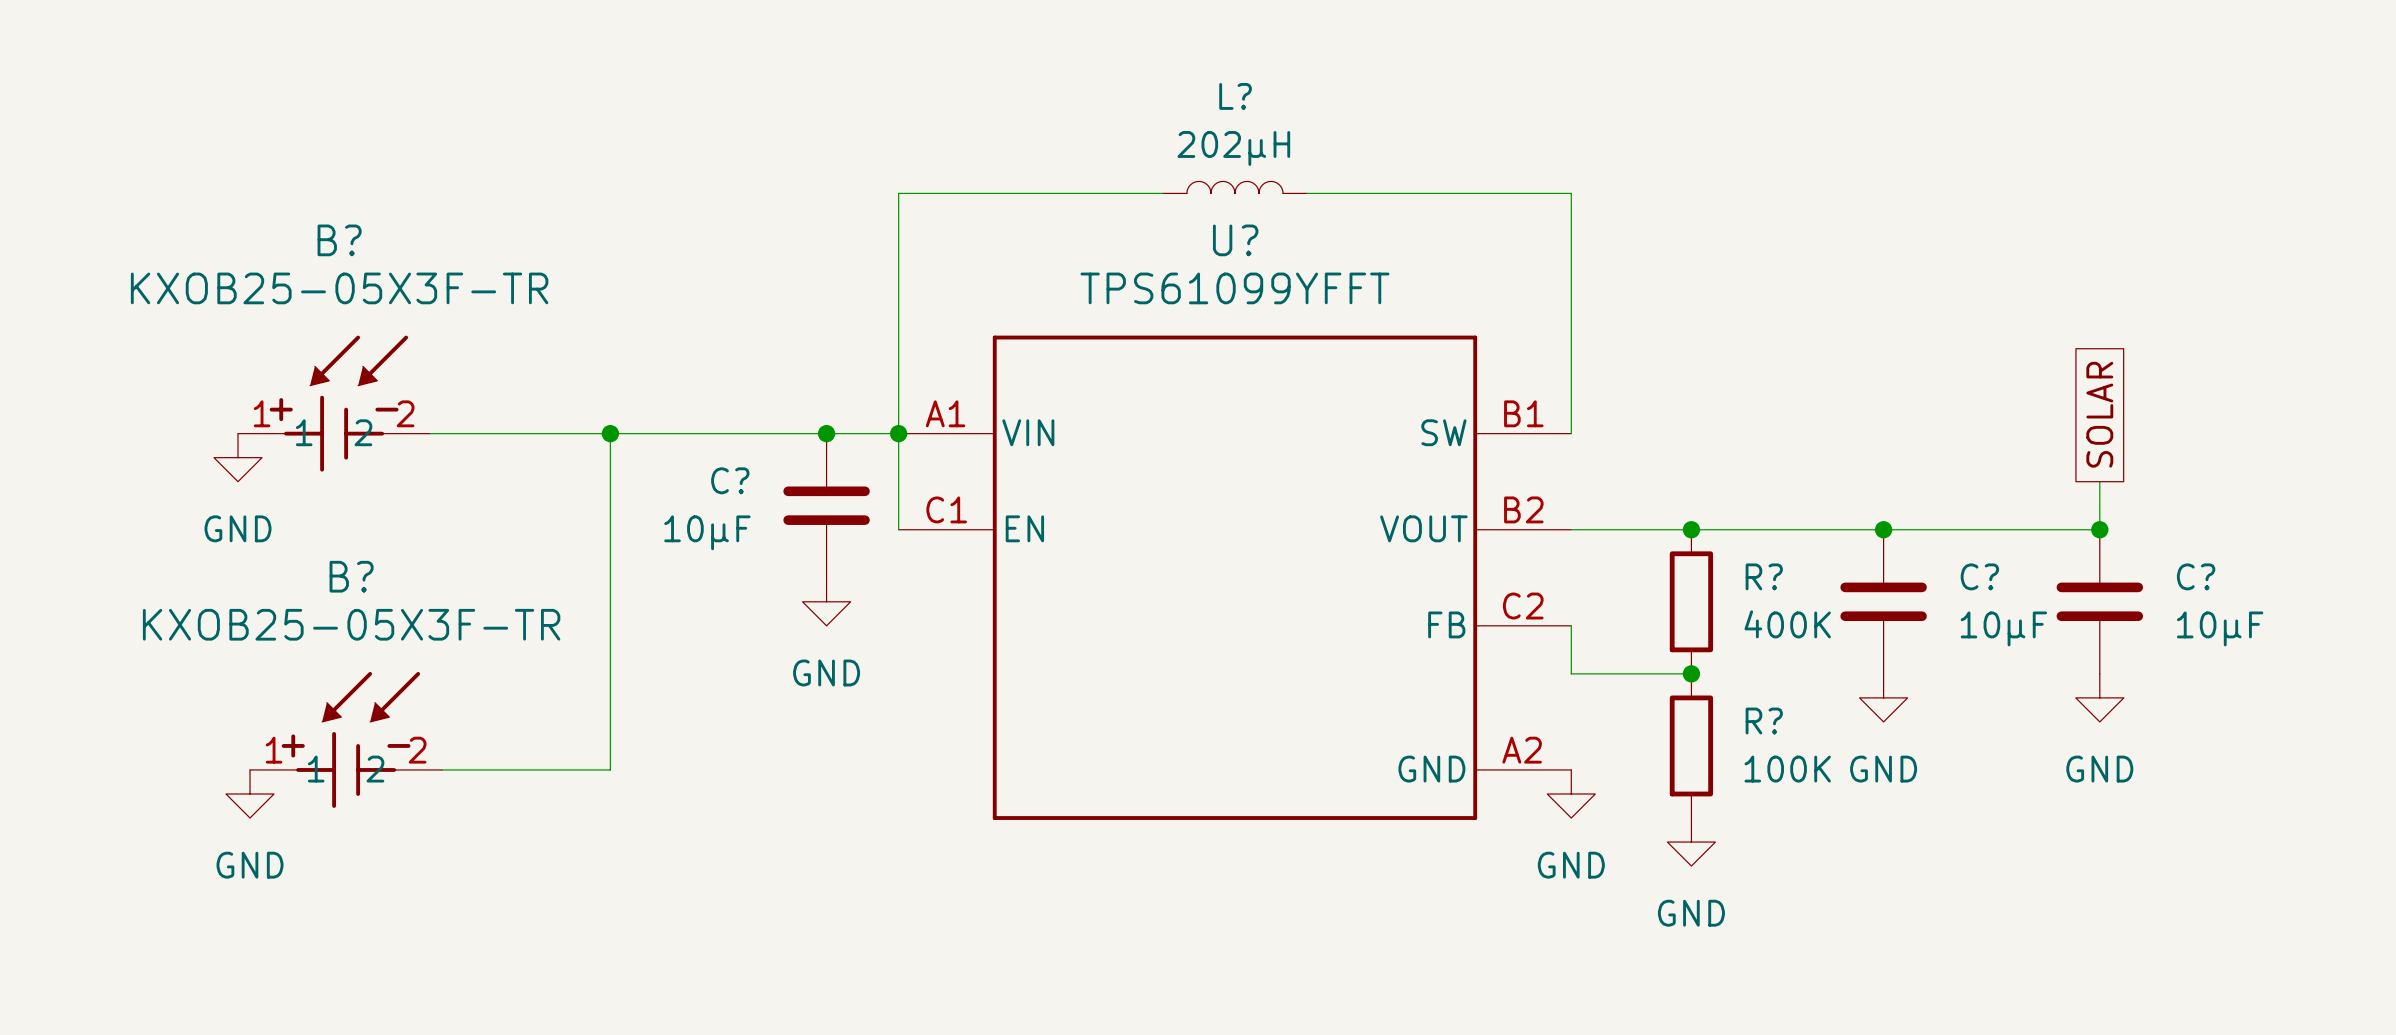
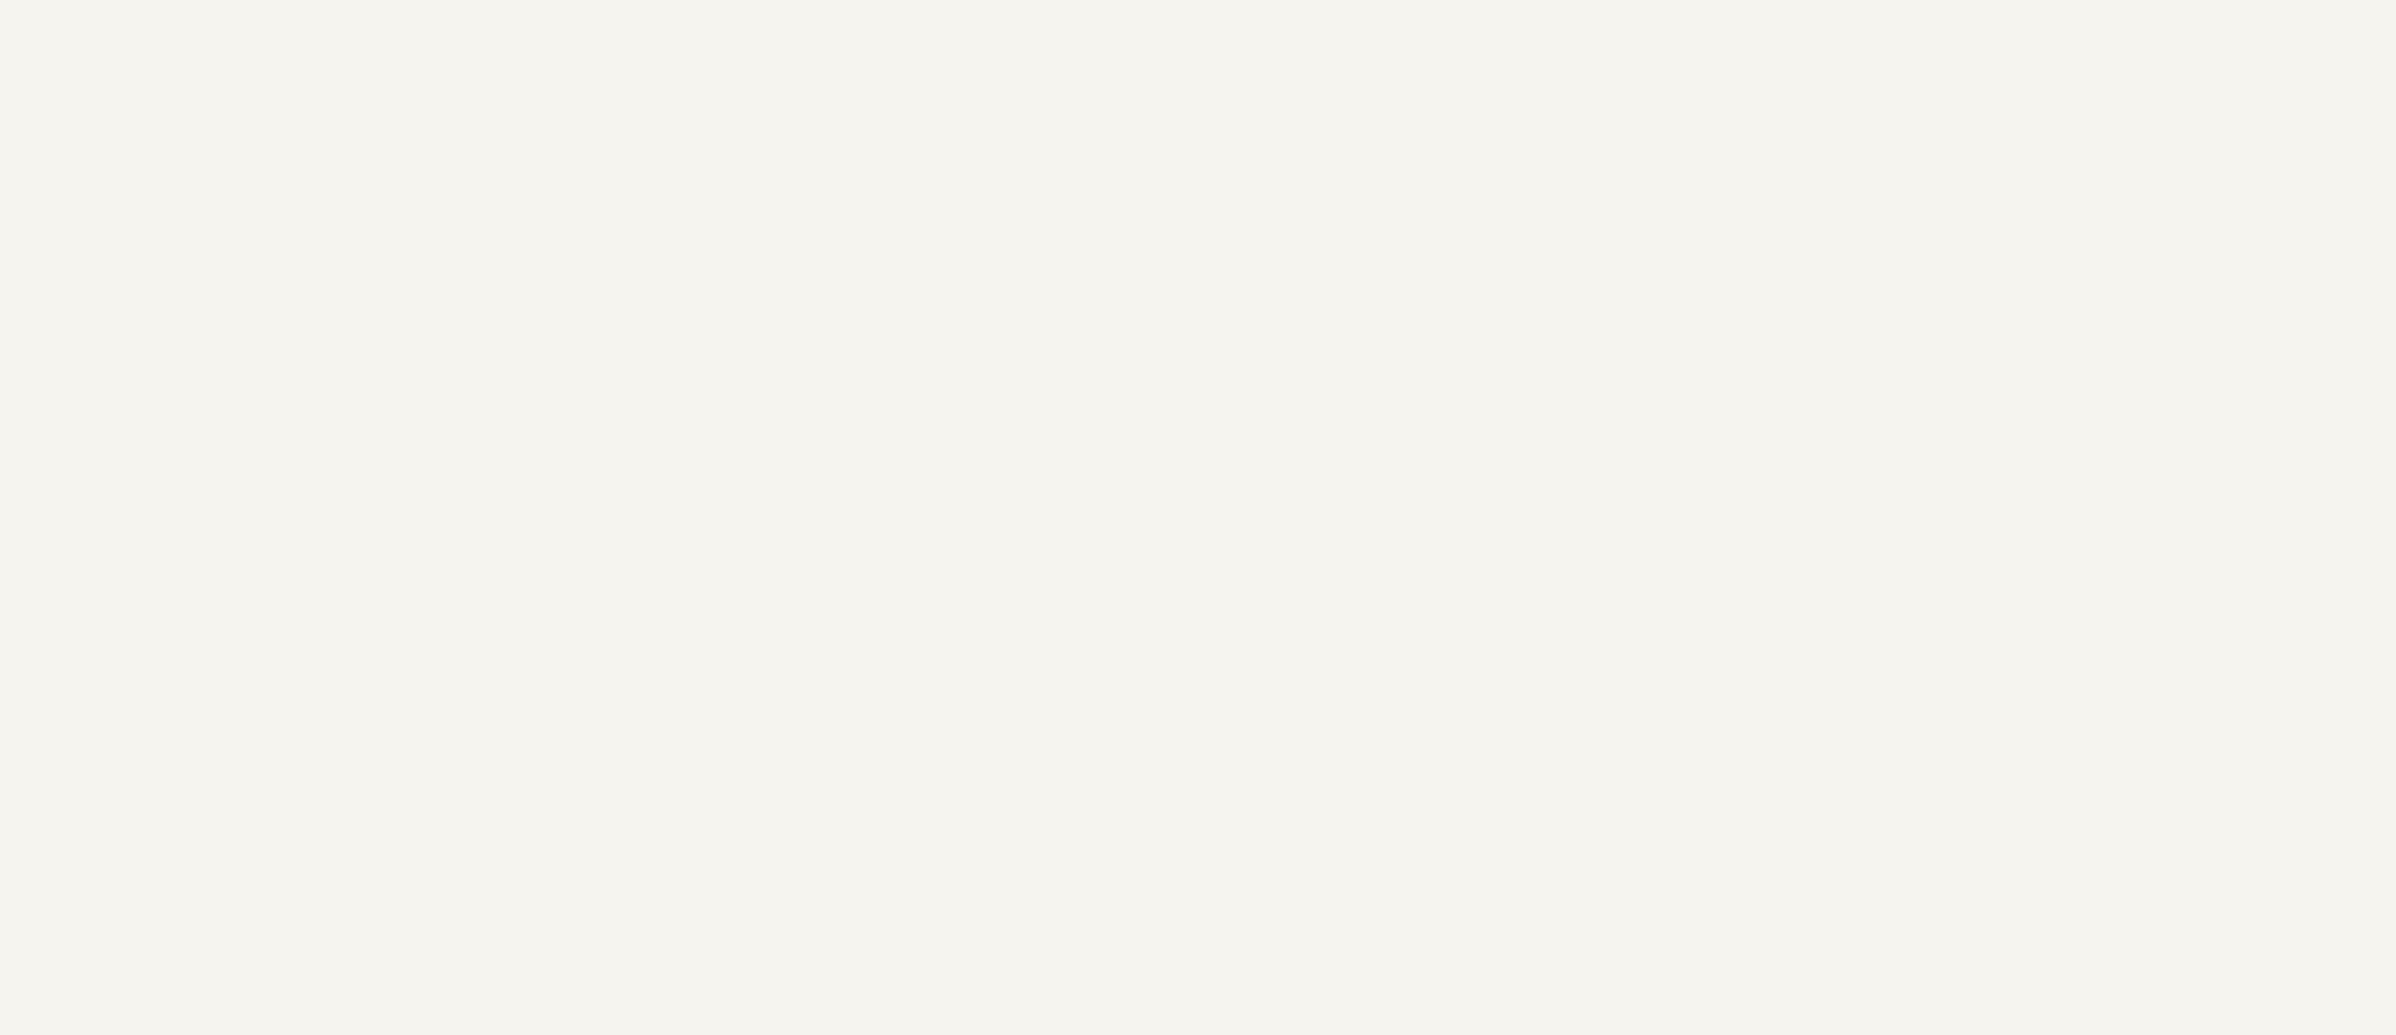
L?: 202µH (1234, 187) -> none
wire: (1162, 193) (898, 193) (898, 529) -> none
wire: (1307, 193) (1571, 193) (1571, 433) -> none
B?: KXOB25-05X3F-TR (334, 403) -> none
global label: SOLAR (2099, 414) -> none
wire: (430, 433) (898, 433) -> none
wire: (610, 433) (610, 769) (442, 769) -> none
junction: (610, 433) -> none
junction: (826, 433) -> none
junction: (898, 433) -> none
power symbol: GND (238, 457) -> none
wire: (2099, 481) (2099, 529) (1571, 529) -> none
C?: 10µF (826, 505) -> none
junction: (1691, 529) -> none
junction: (1883, 529) -> none
junction: (2099, 529) -> none
U?: TPS61099YFFT (1234, 577) -> none
power symbol: GND (826, 601) -> none
R?: 400K (1691, 601) -> none
C?: 10µF (1883, 601) -> none
C?: 10µF (2099, 601) -> none
wire: (1571, 625) (1571, 673) (1691, 673) -> none
junction: (1691, 673) -> none
power symbol: GND (1883, 697) -> none
power symbol: GND (2099, 697) -> none
B?: KXOB25-05X3F-TR (346, 739) -> none
R?: 100K (1691, 745) -> none
power symbol: GND (250, 793) -> none
power symbol: GND (1571, 793) -> none
power symbol: GND (1691, 842) -> none

